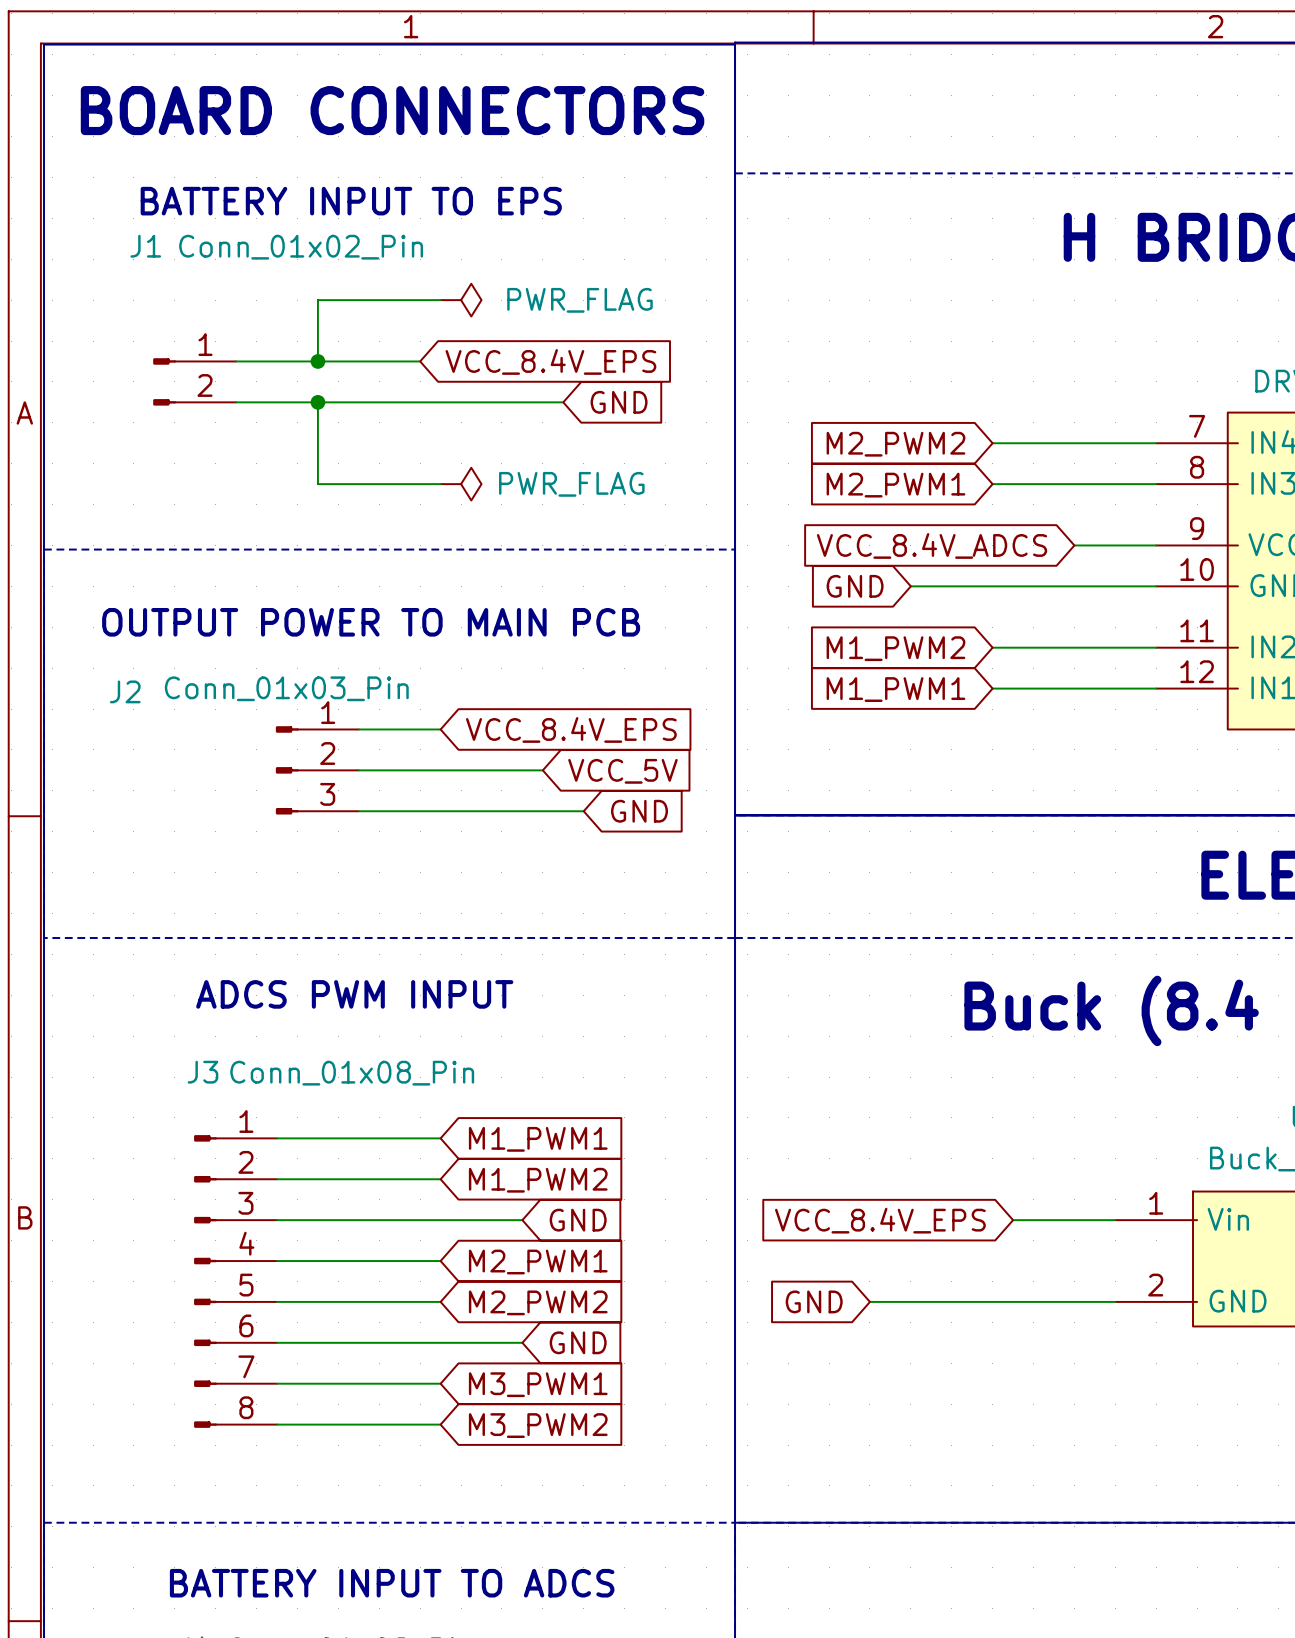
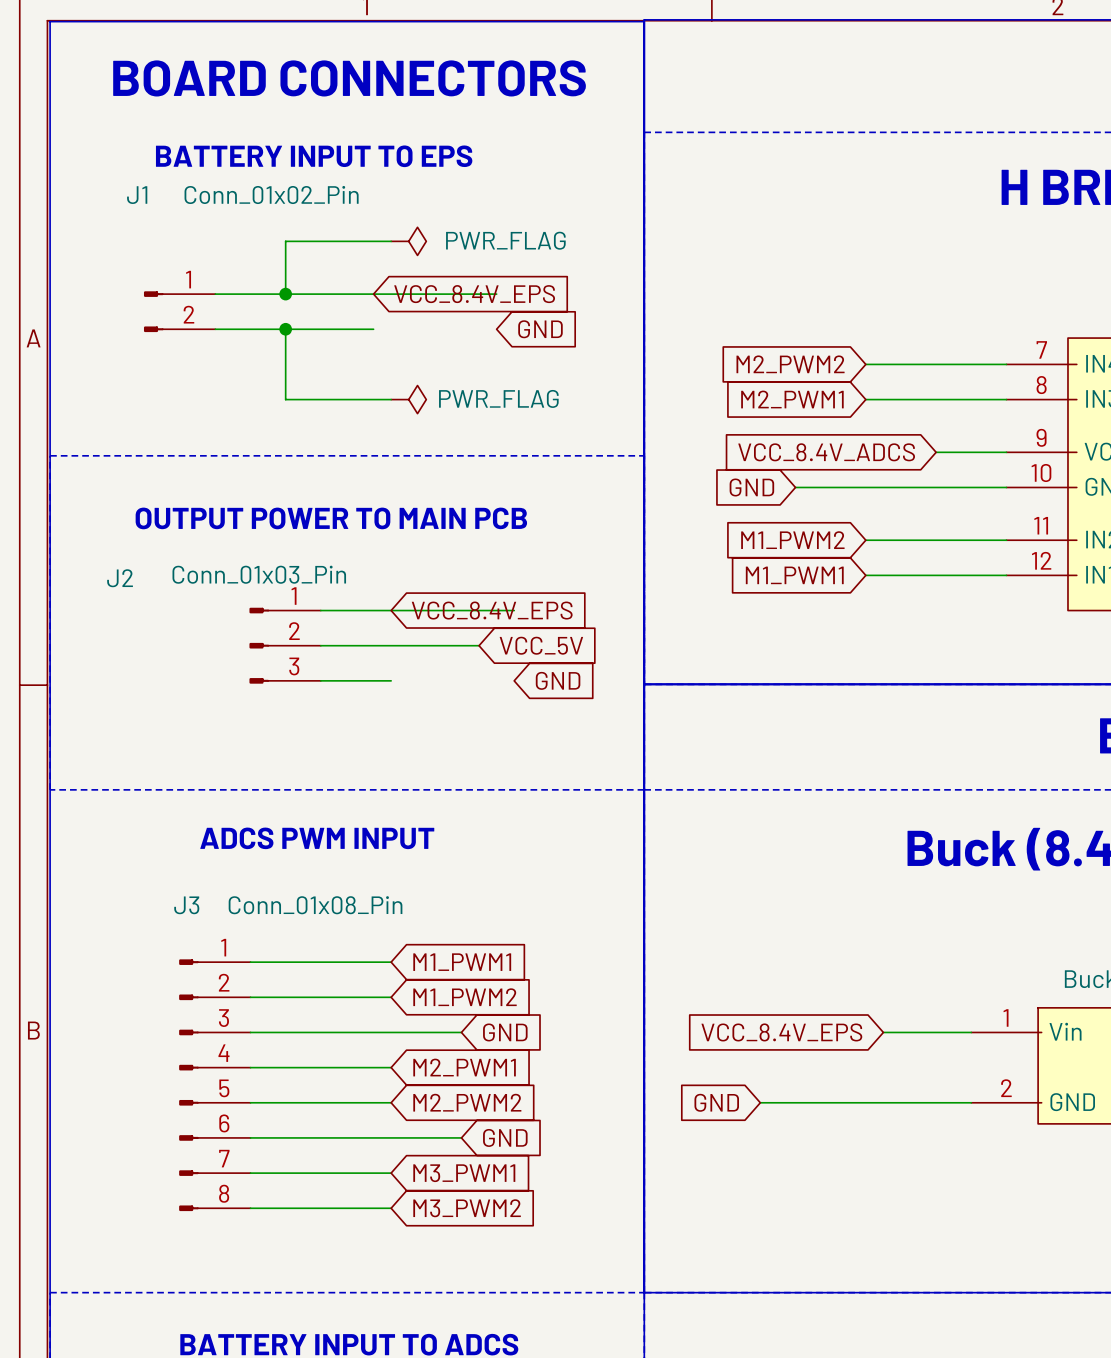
wire: (420, 402) (563, 402) -> (373, 294) (496, 294)
wire: (440, 811) (583, 811) -> (391, 610) (514, 610)

